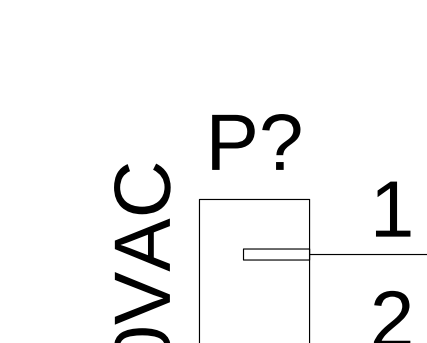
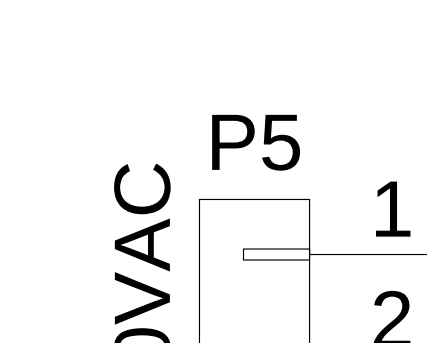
P? name: P? (256, 141) -> P5 (256, 142)

